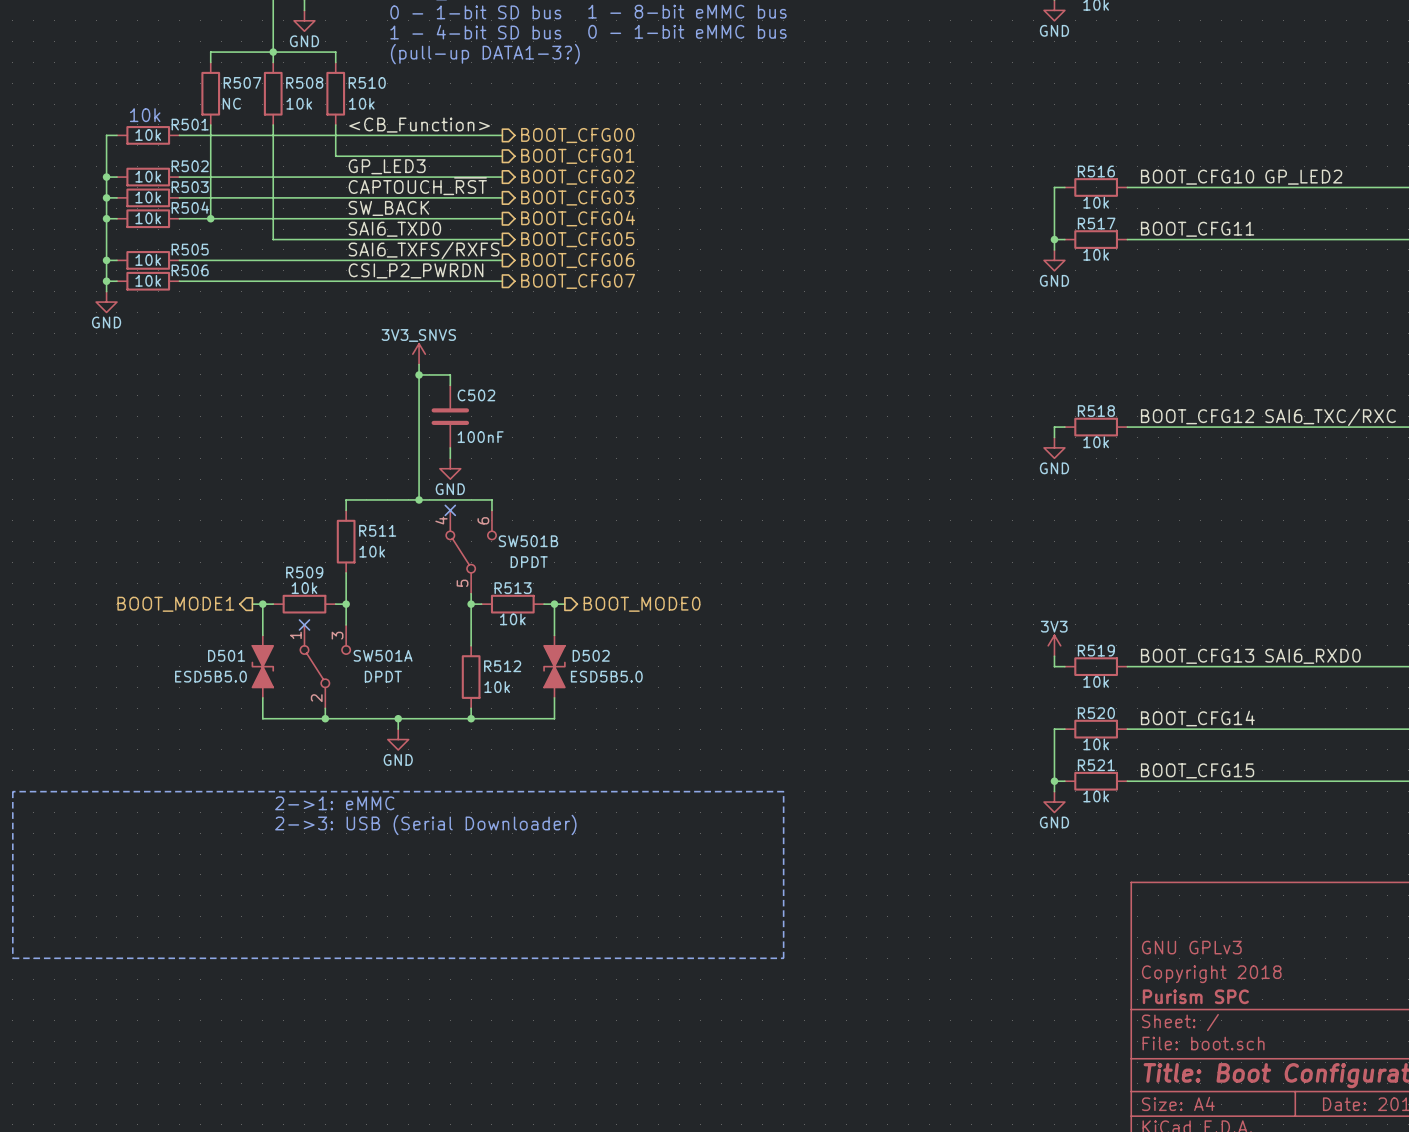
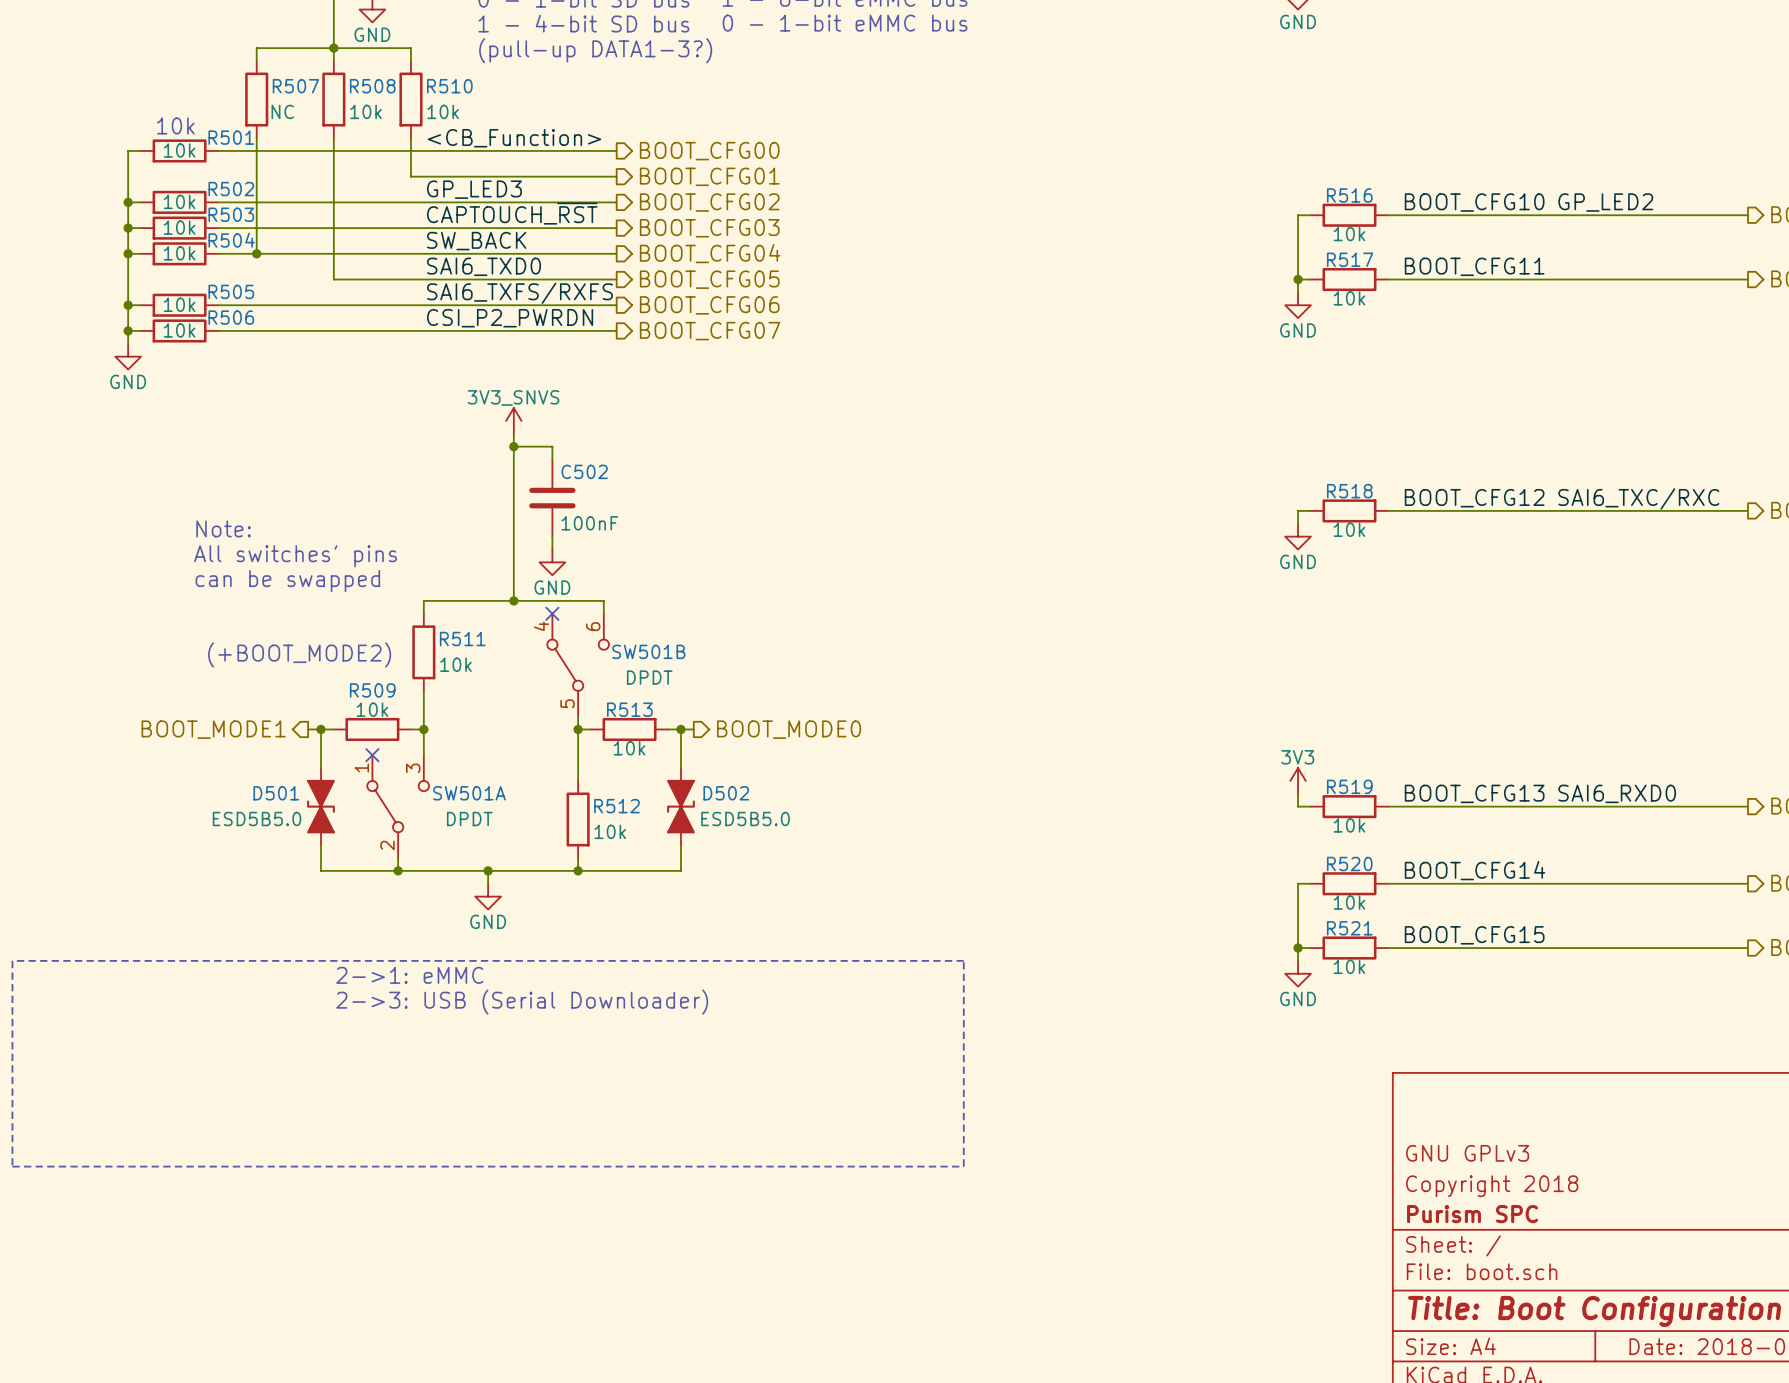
text: none -> Note: (223, 528)
text: none -> All switches' pins (295, 556)
text: none -> can be swapped (287, 581)
text: none -> (+BOOT_MODE2) (299, 654)

